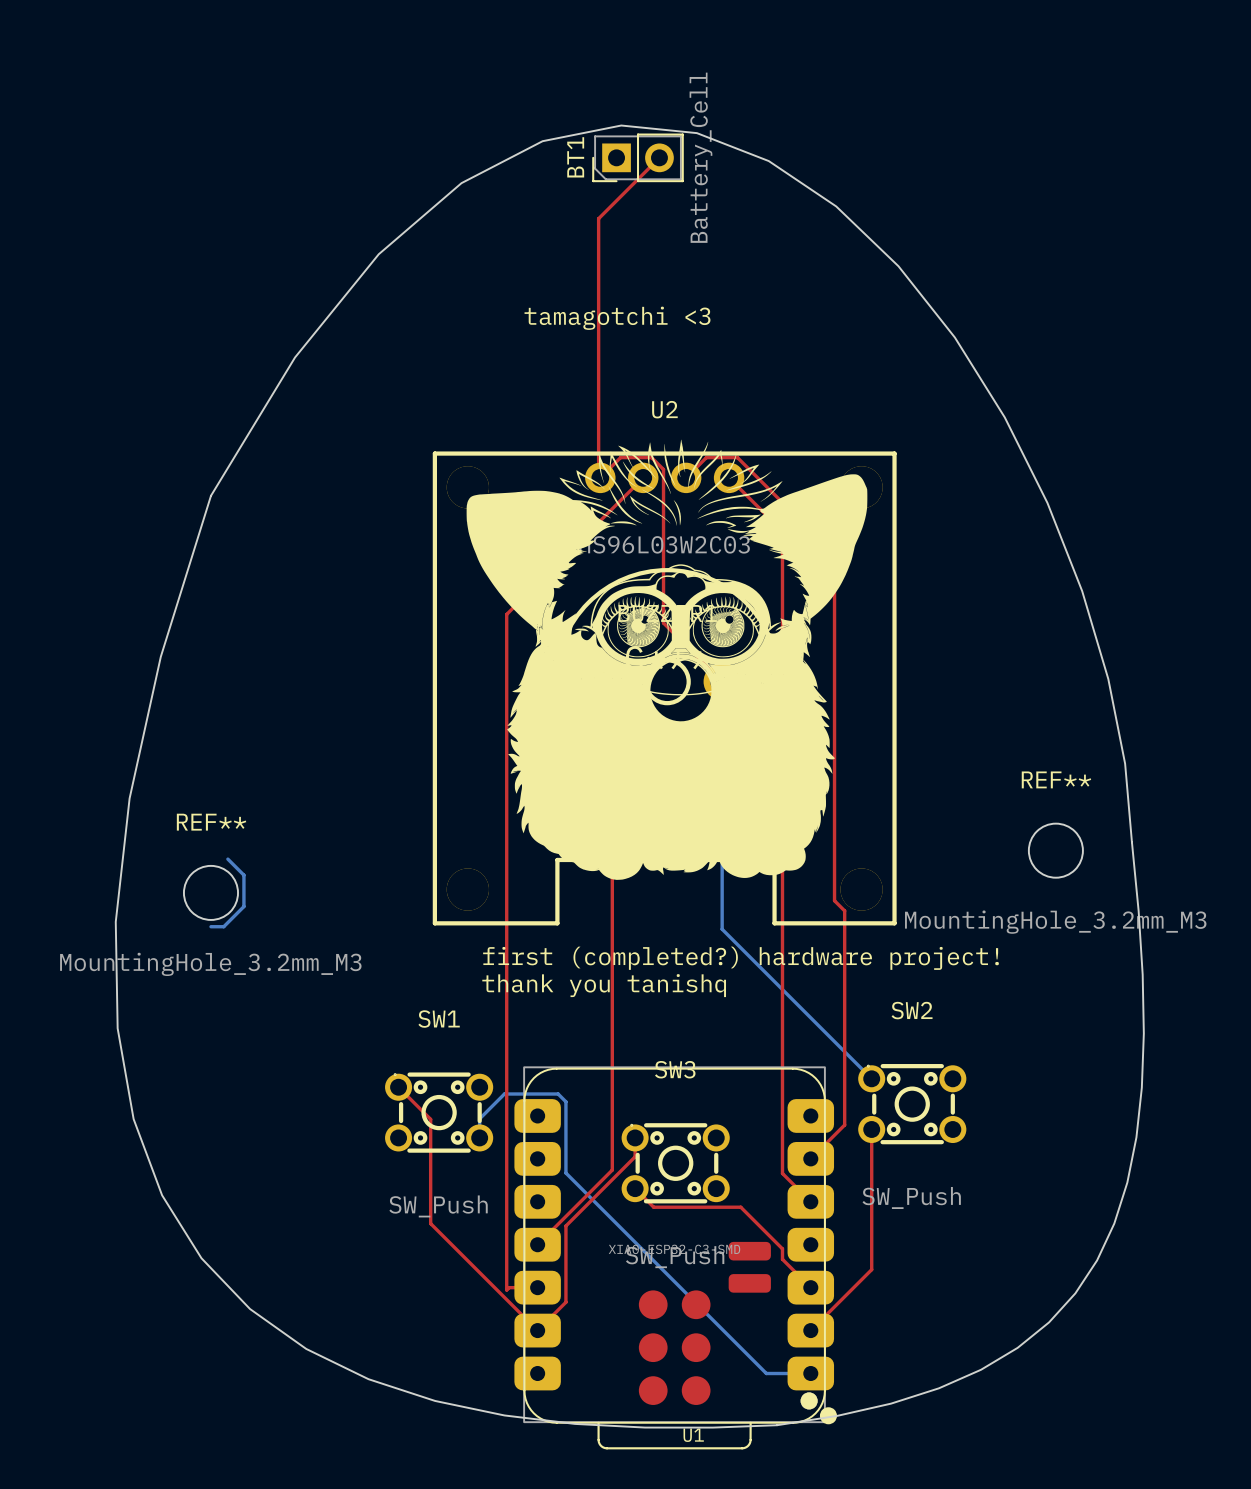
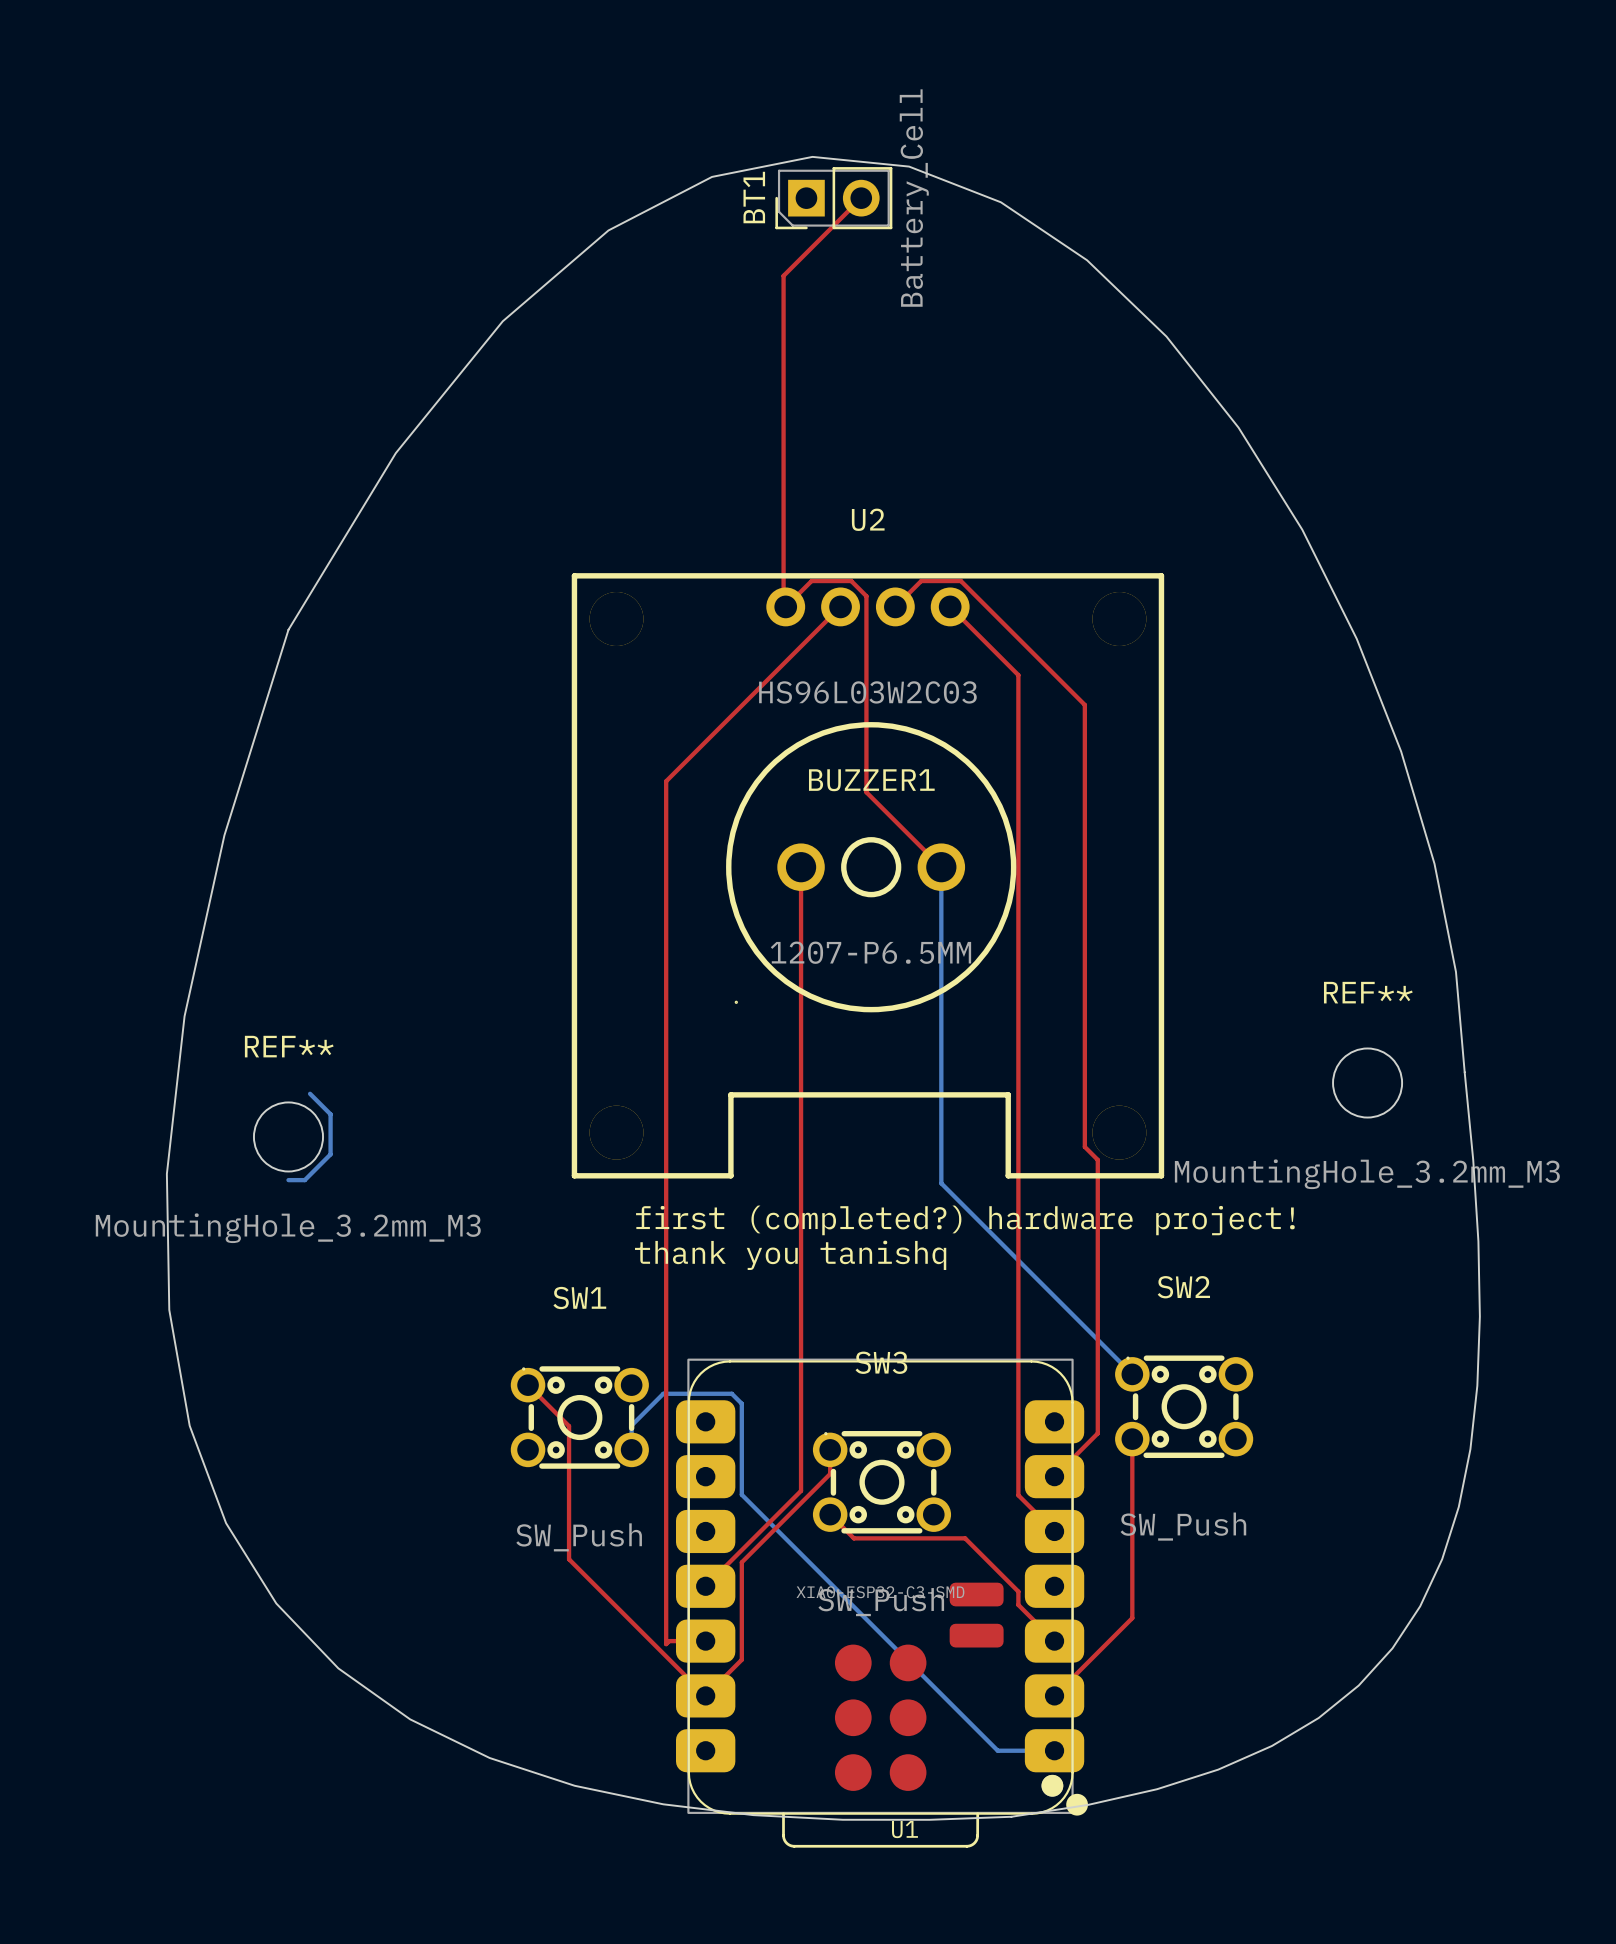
text: tamagotchi <3 (617, 318) -> none
part: (666, 659) -> none

